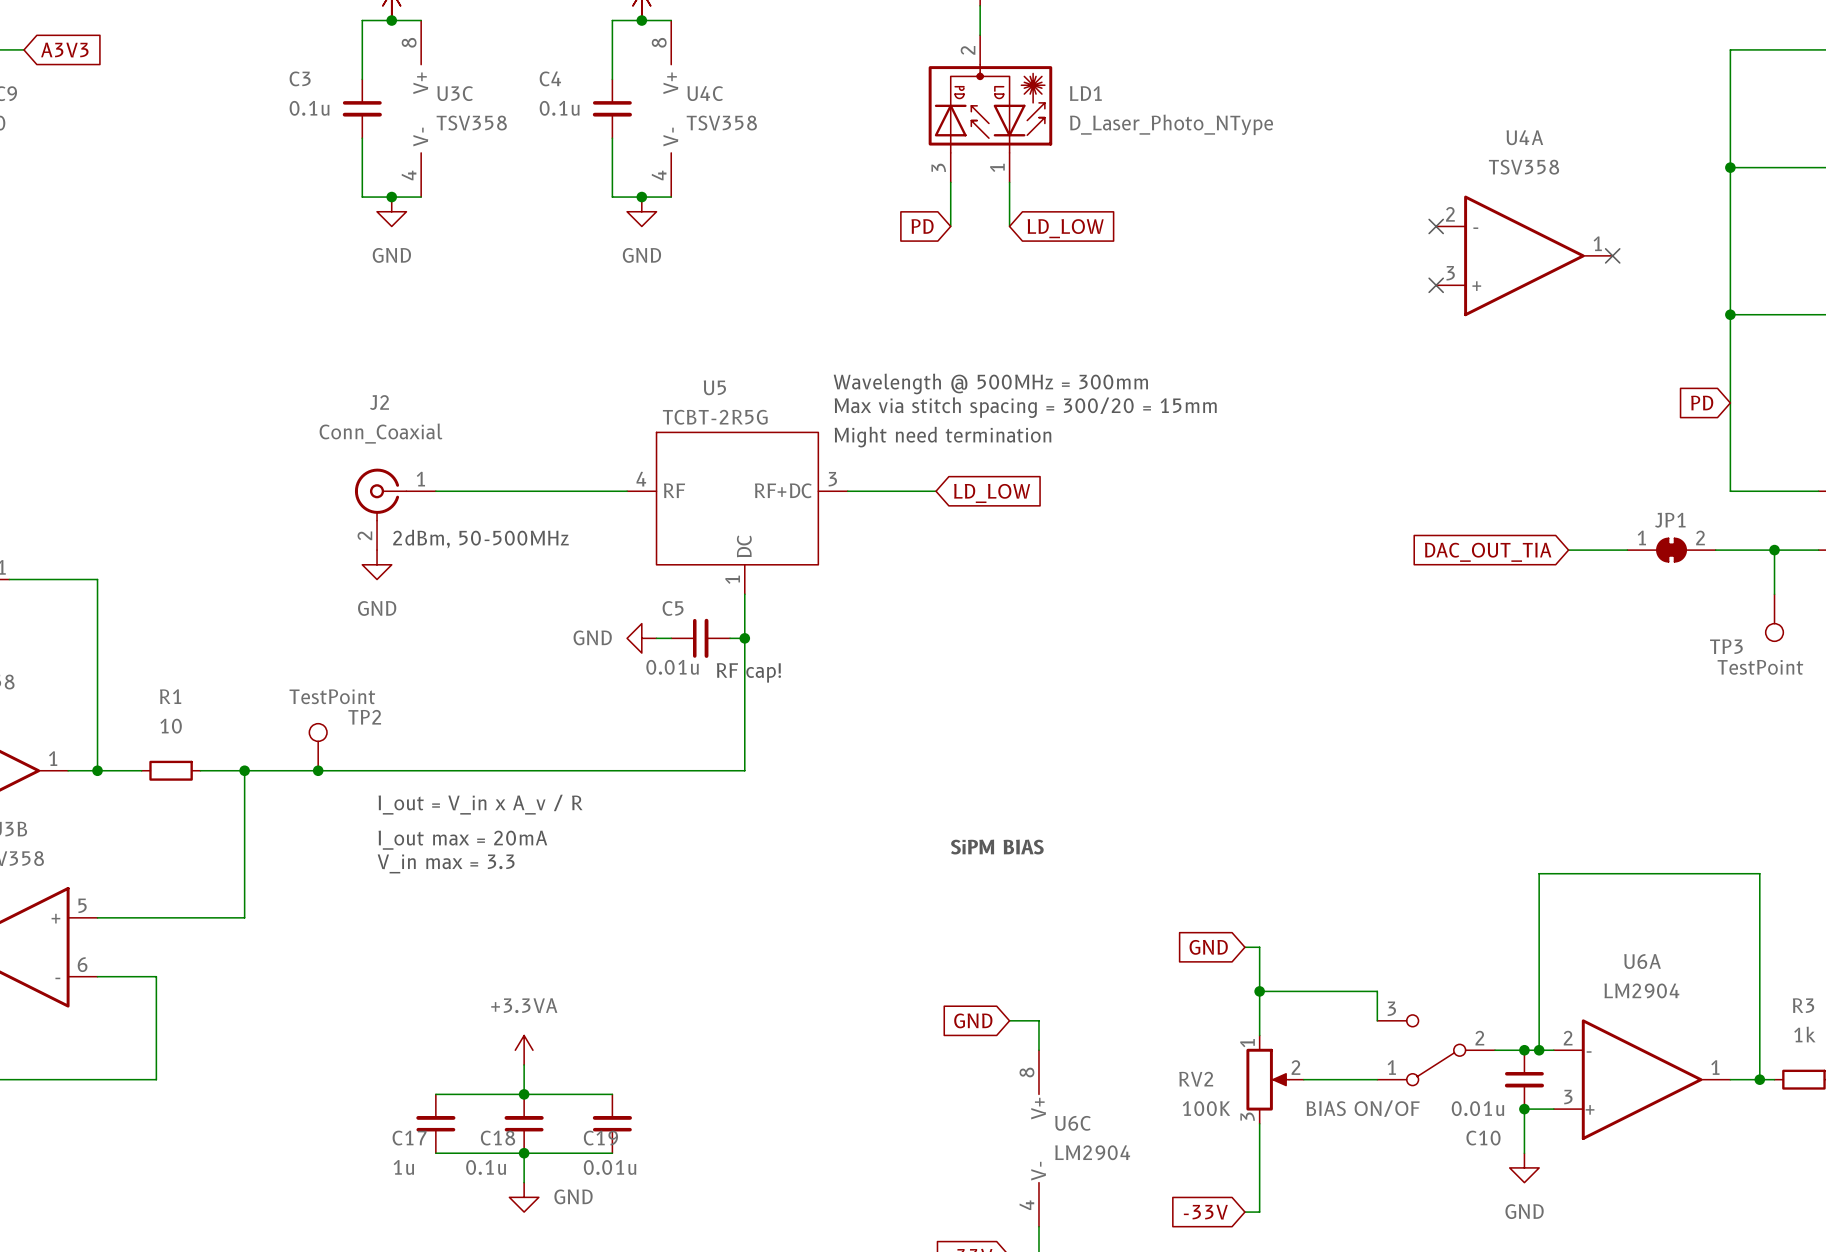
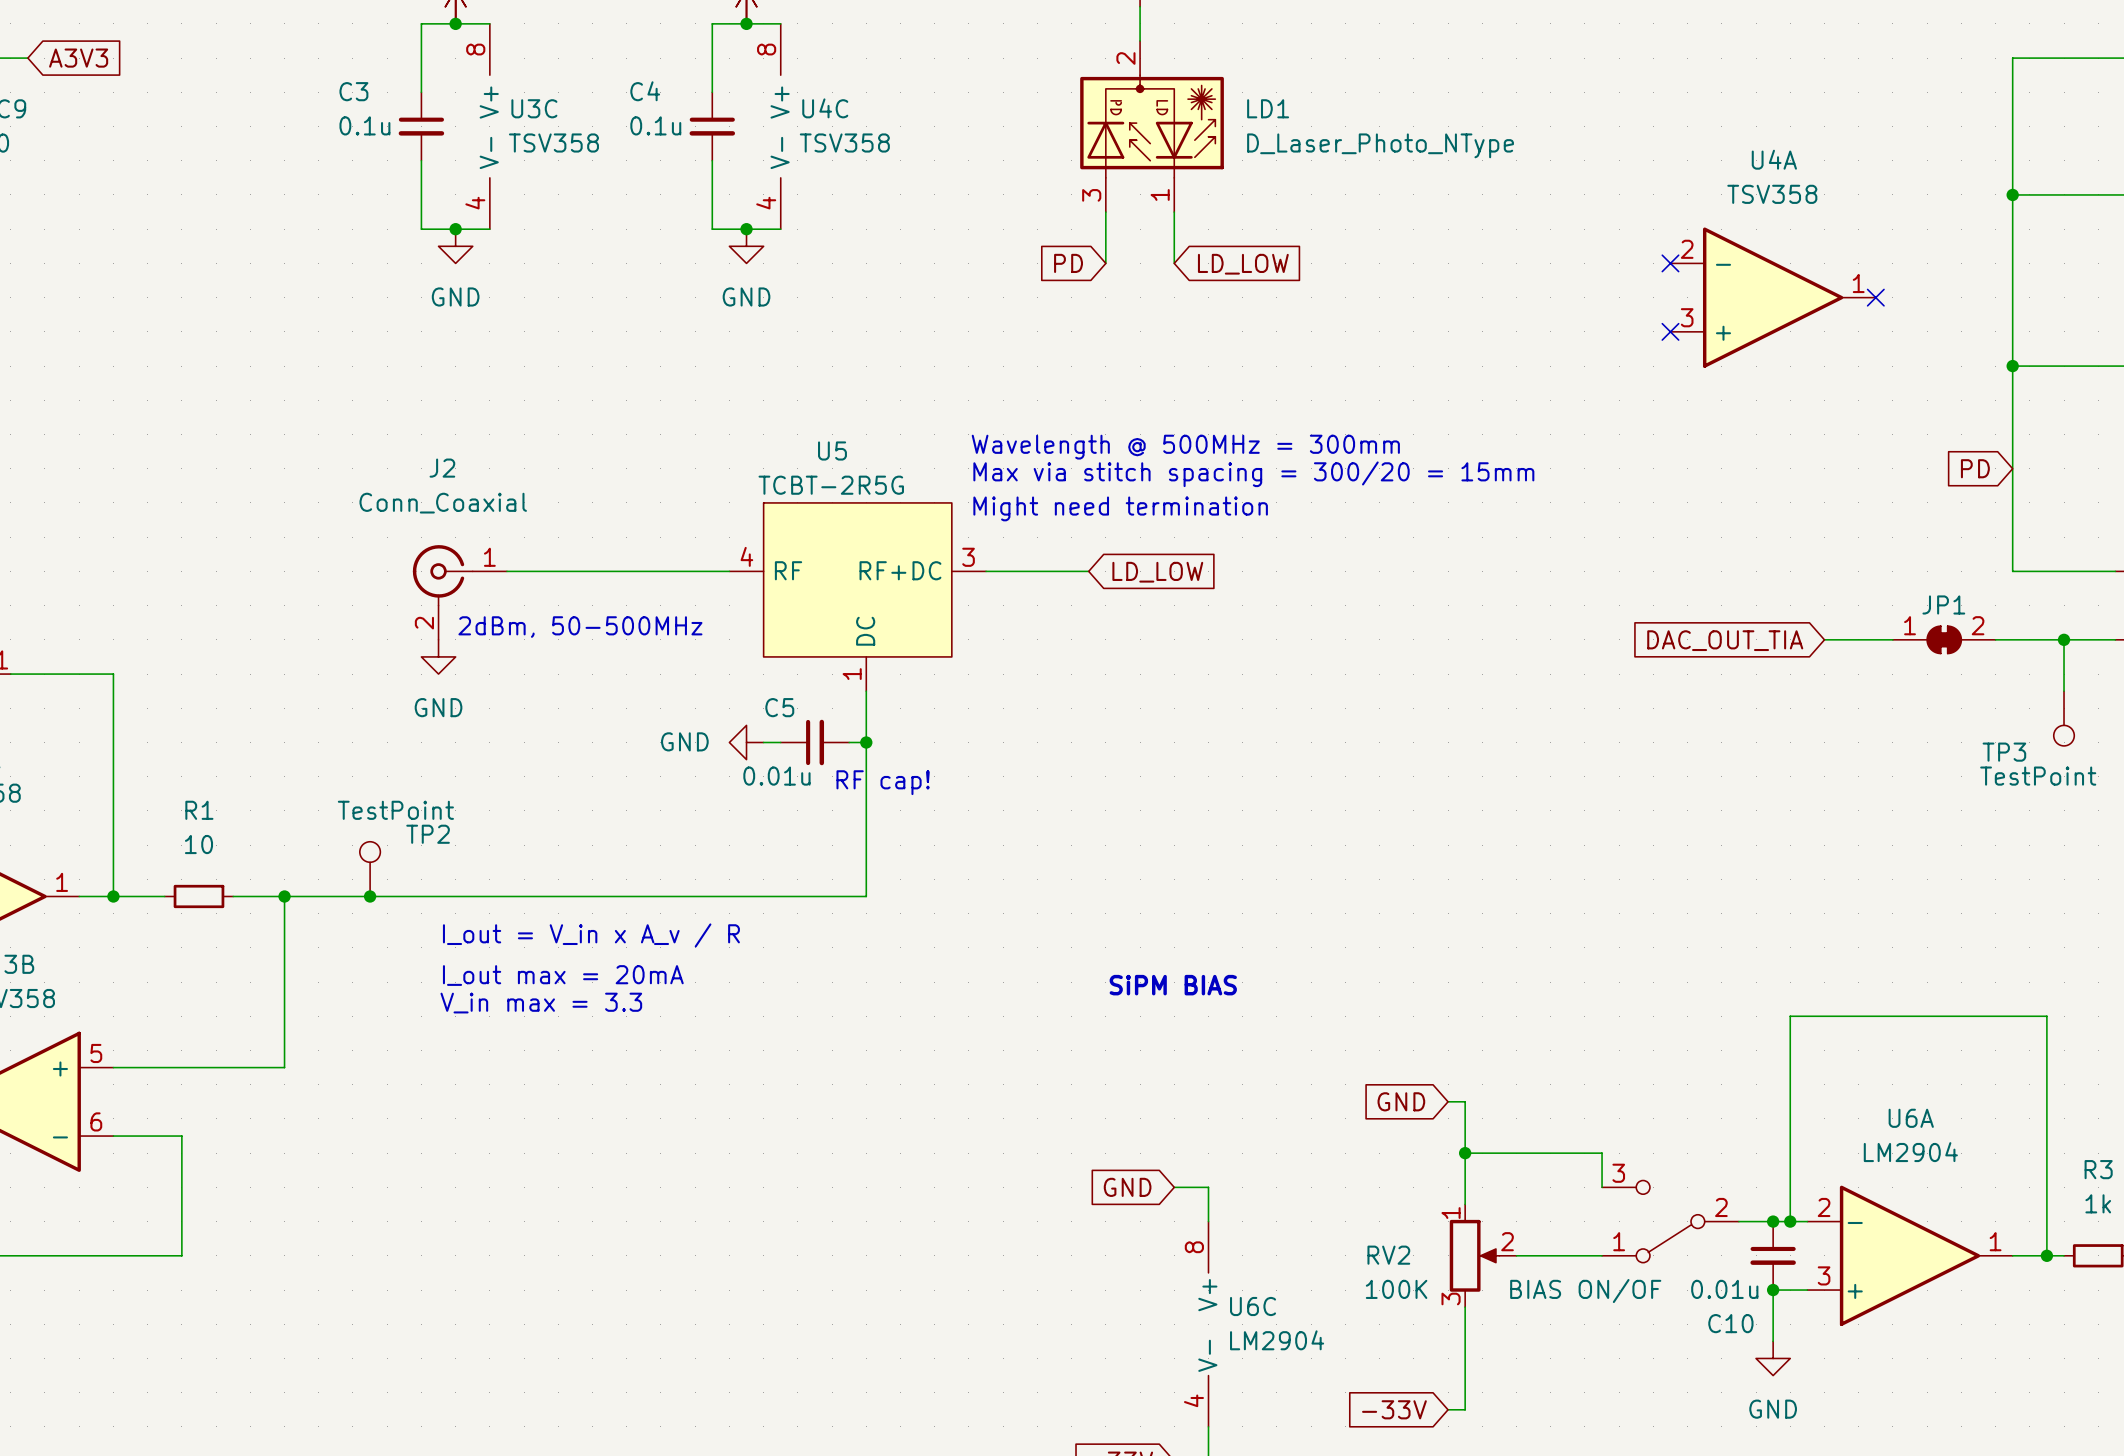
power symbol: +3.3VA (524, 1050) -> none
wire: (524, 1064) (524, 1094) -> none
wire: (435, 1094) (612, 1094) -> none
junction: (524, 1094) -> none
C17: 1u (435, 1123) -> none
C18: 0.1u (524, 1123) -> none
C19: 0.01u (612, 1123) -> none
wire: (435, 1153) (612, 1153) -> none
wire: (524, 1153) (524, 1182) -> none
junction: (524, 1153) -> none
power symbol: GND (524, 1197) -> none

